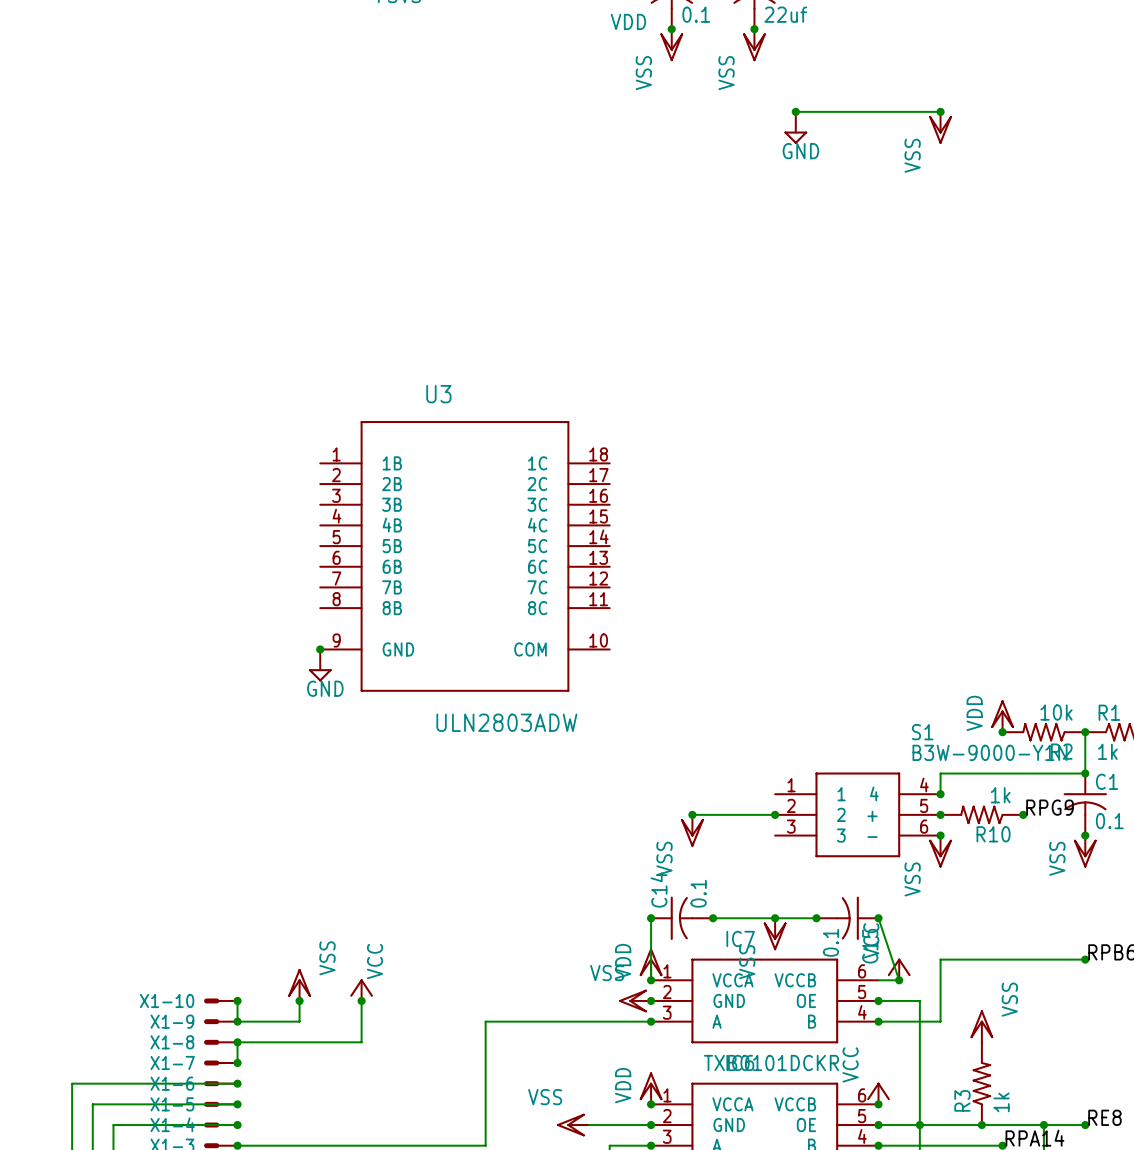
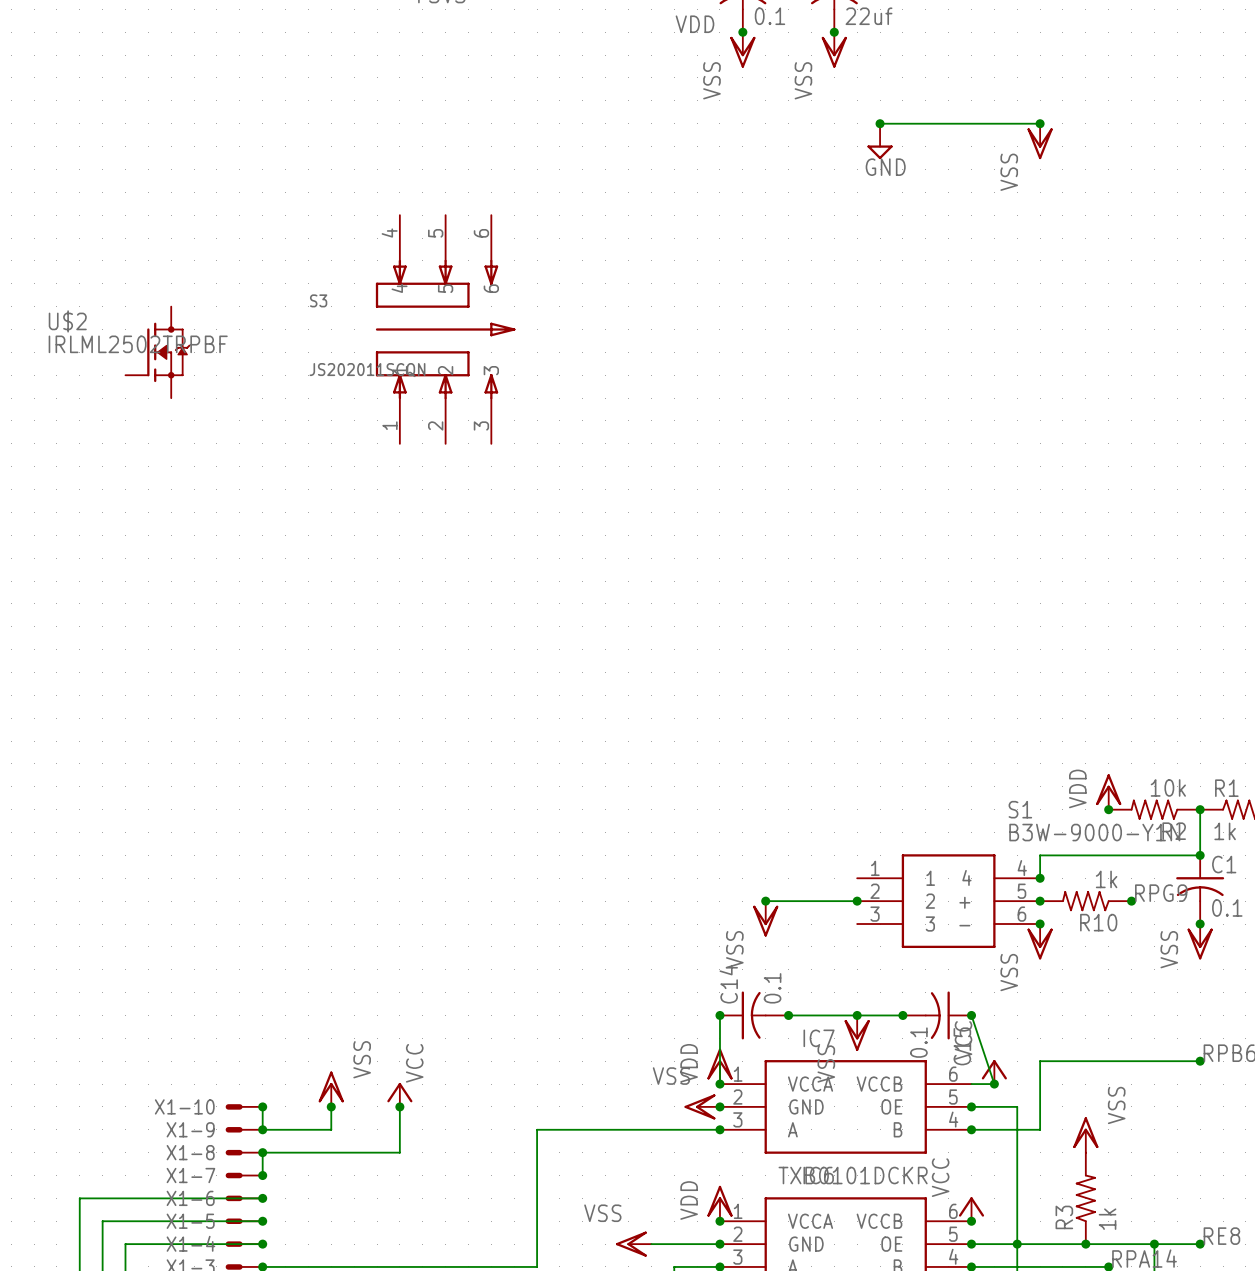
S3: none -> JS202011SCQN (445, 329)
U$2: none -> IRLML2502TRPBF (157, 352)
U3: ULN2803ADW (464, 556) -> none
junction: (320, 649) -> none
power symbol: GND (320, 665) -> none

